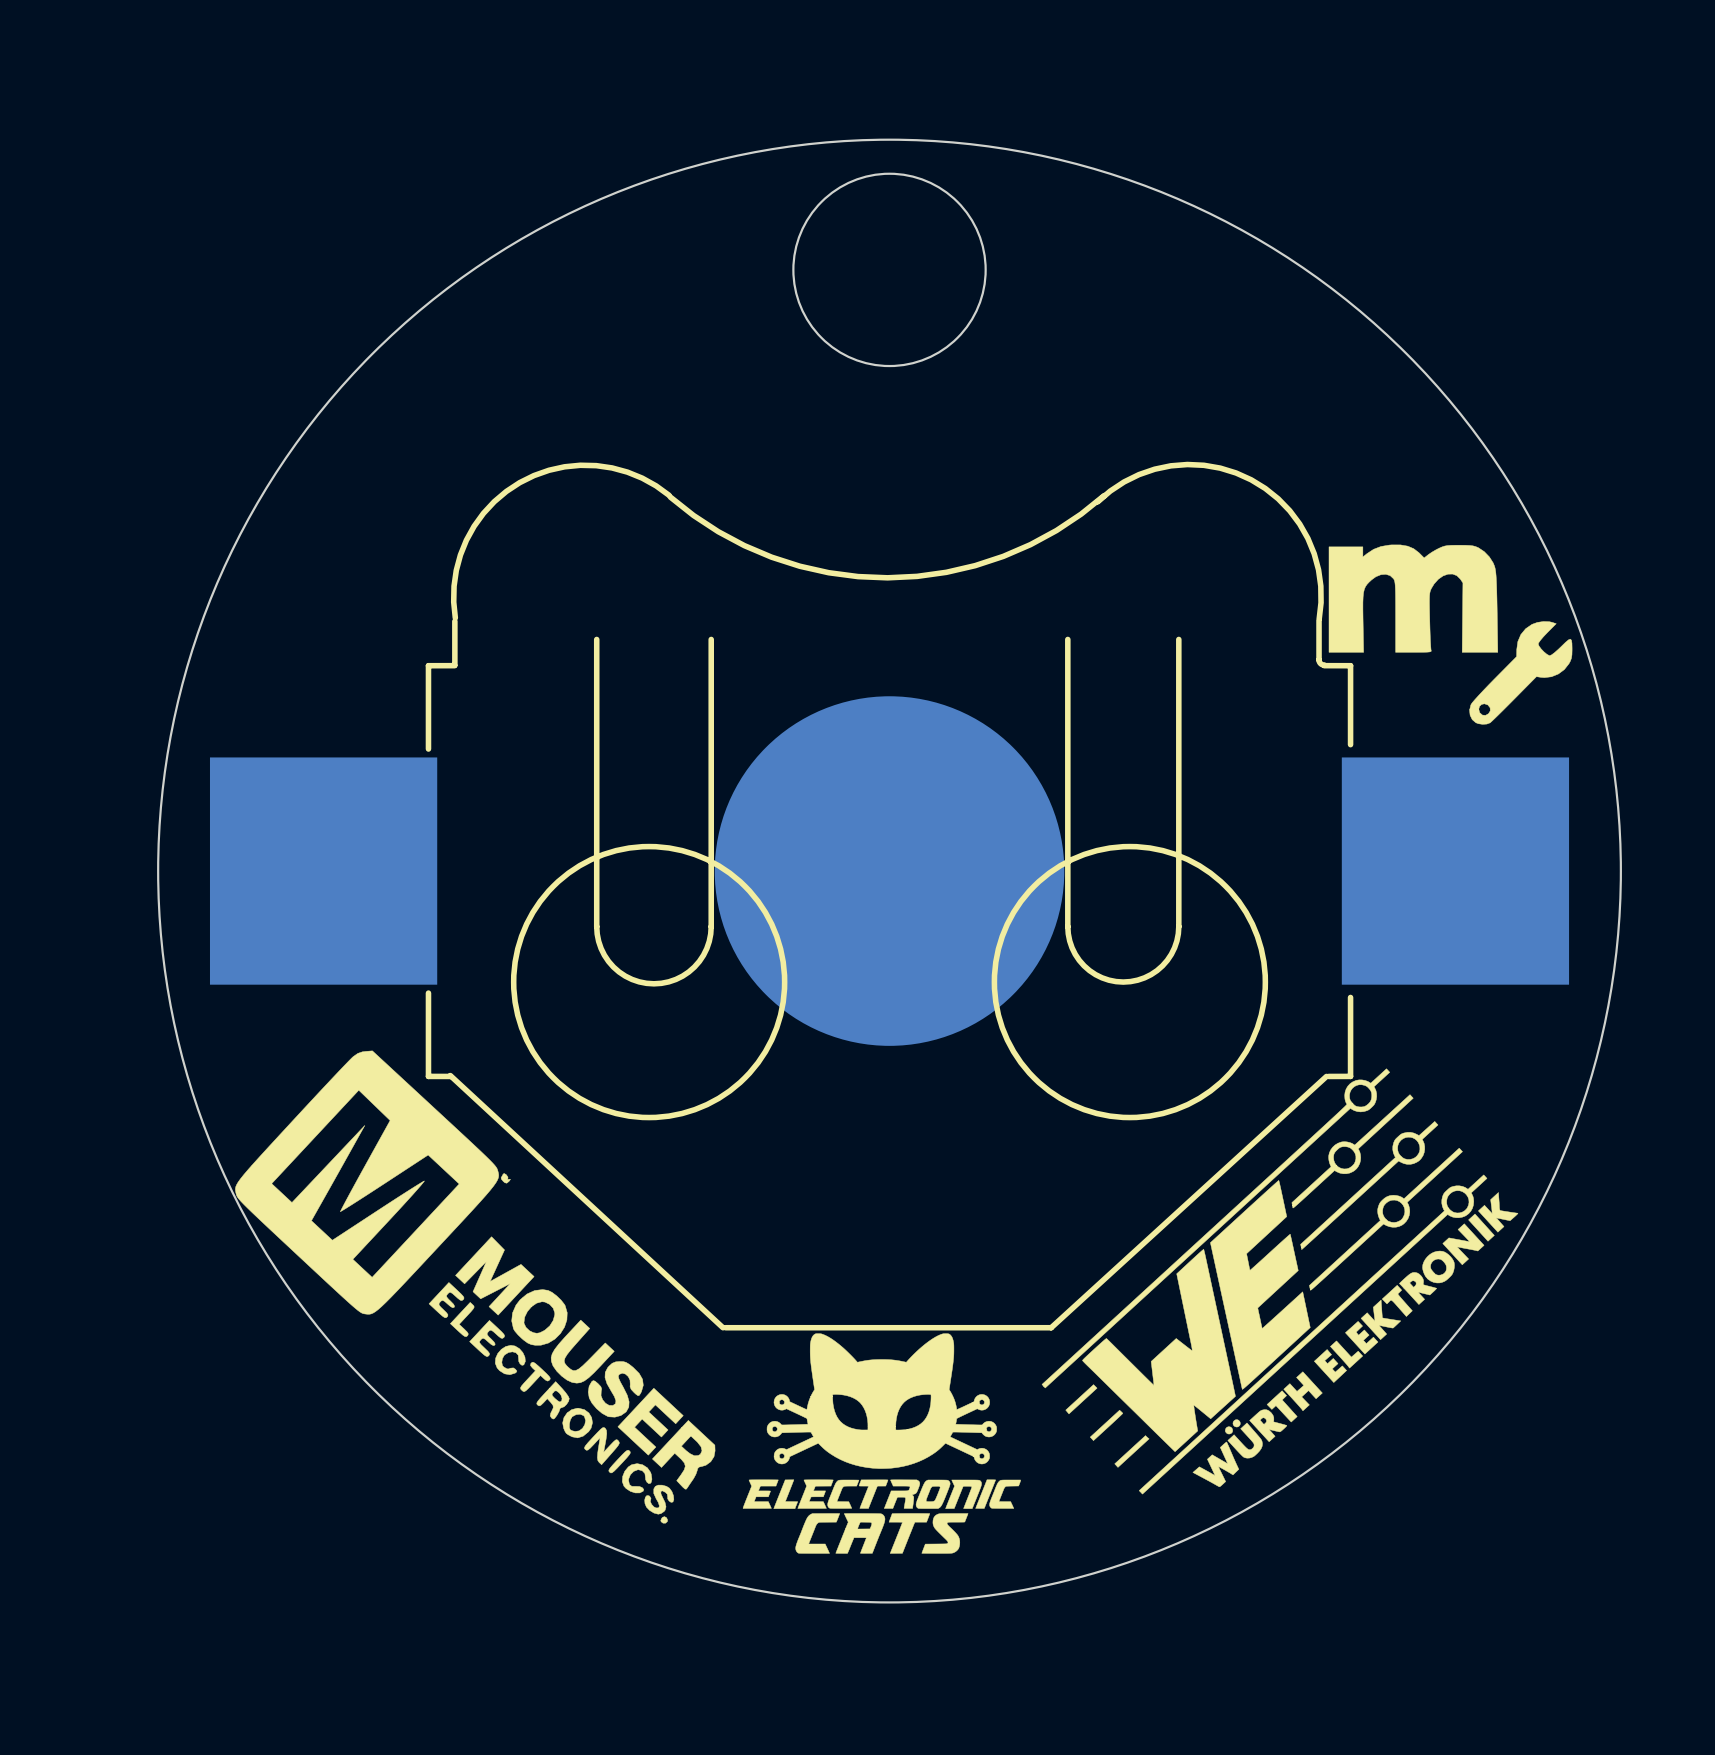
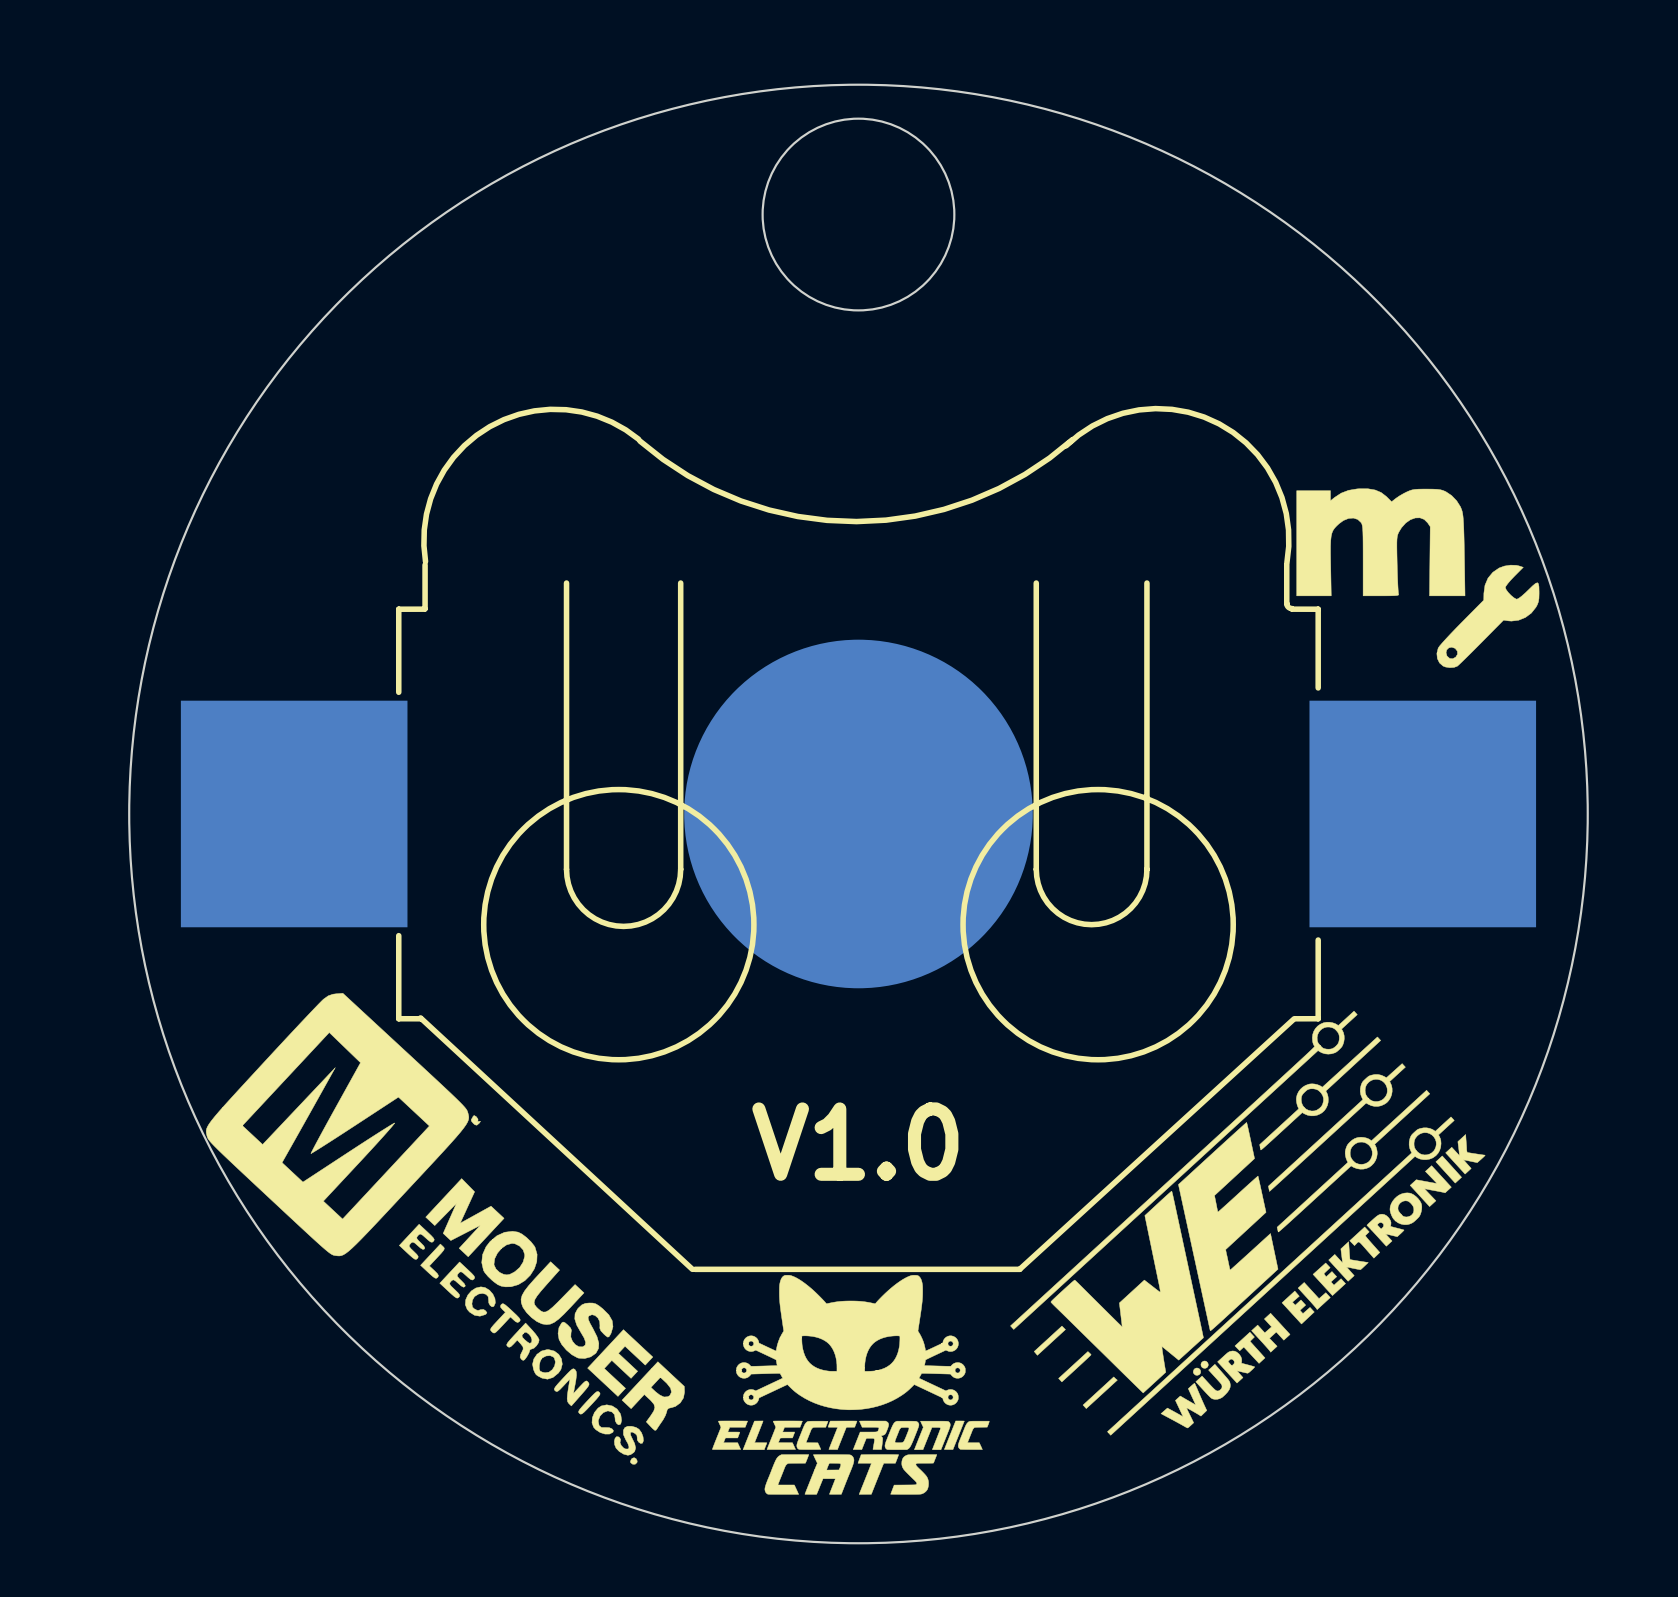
text: none -> V1.0 (855, 1141)

